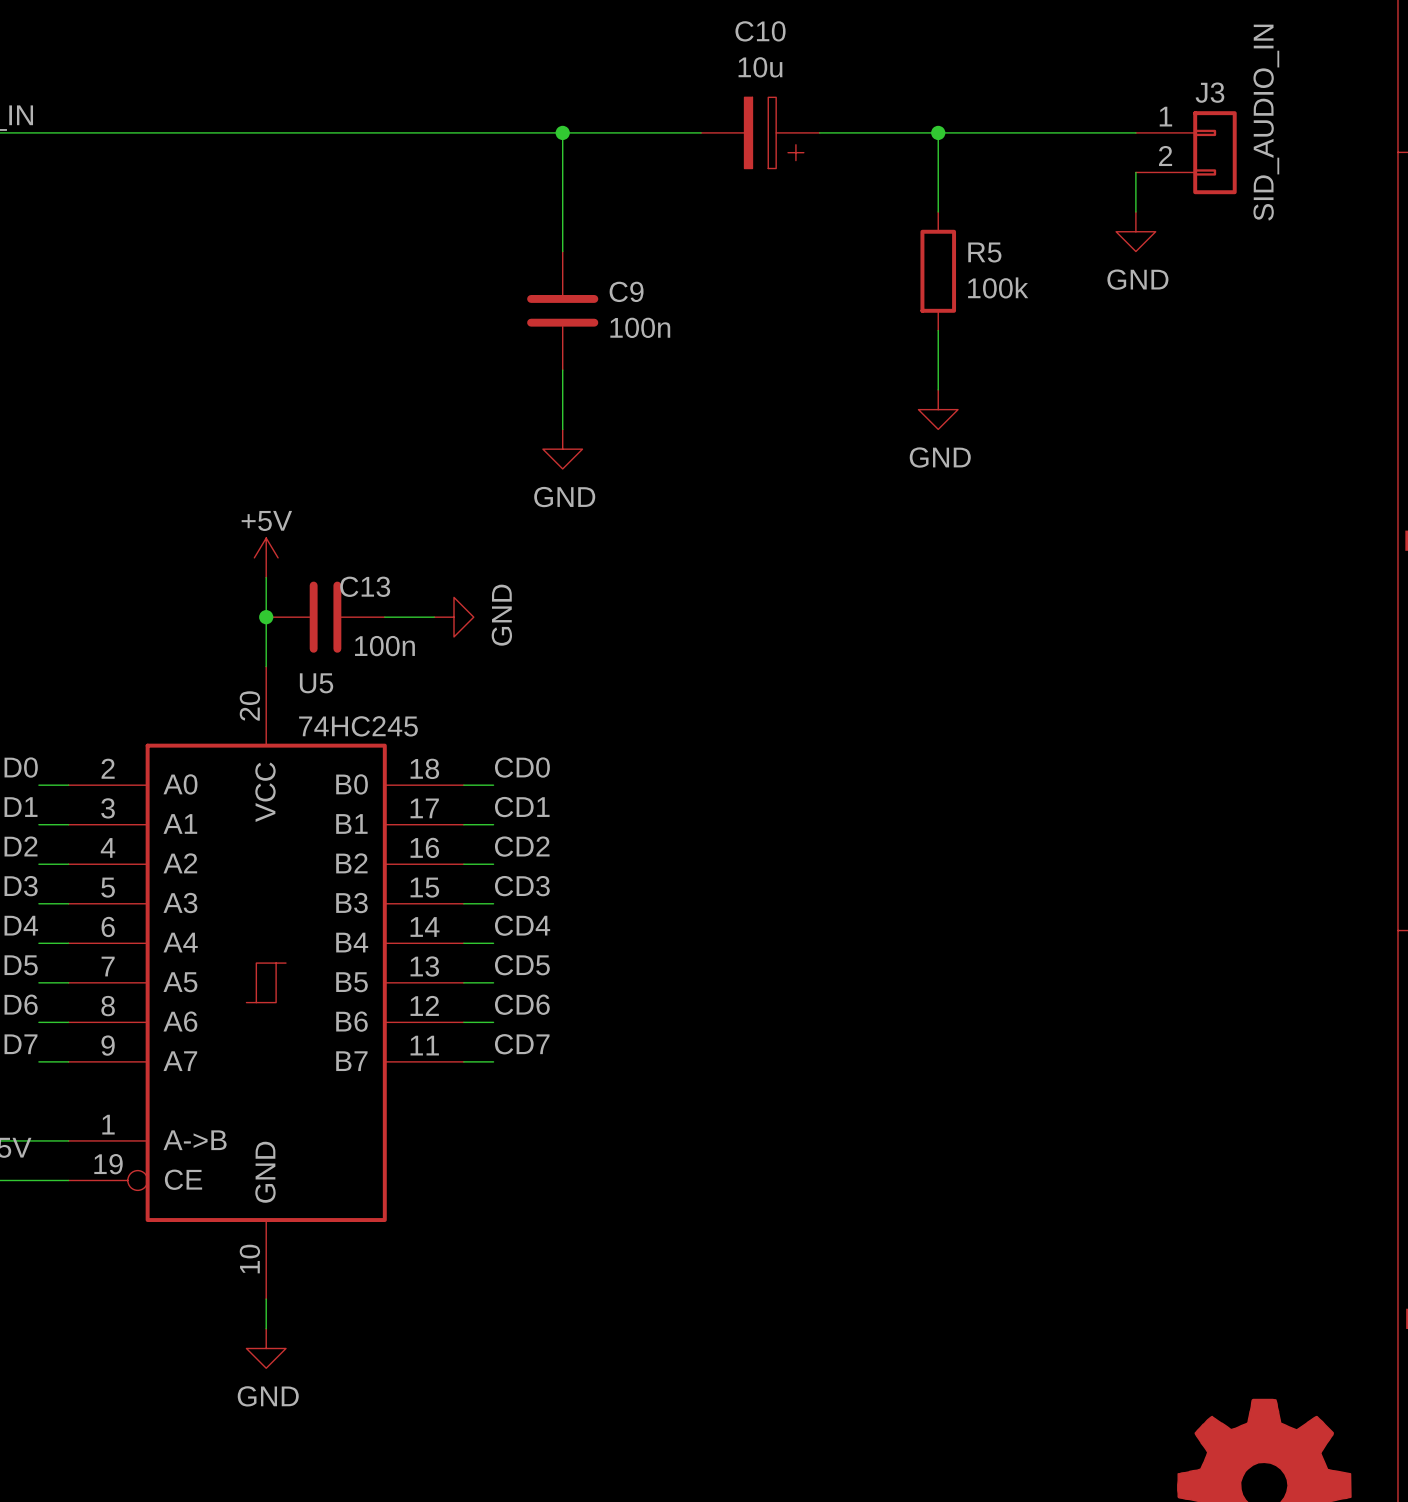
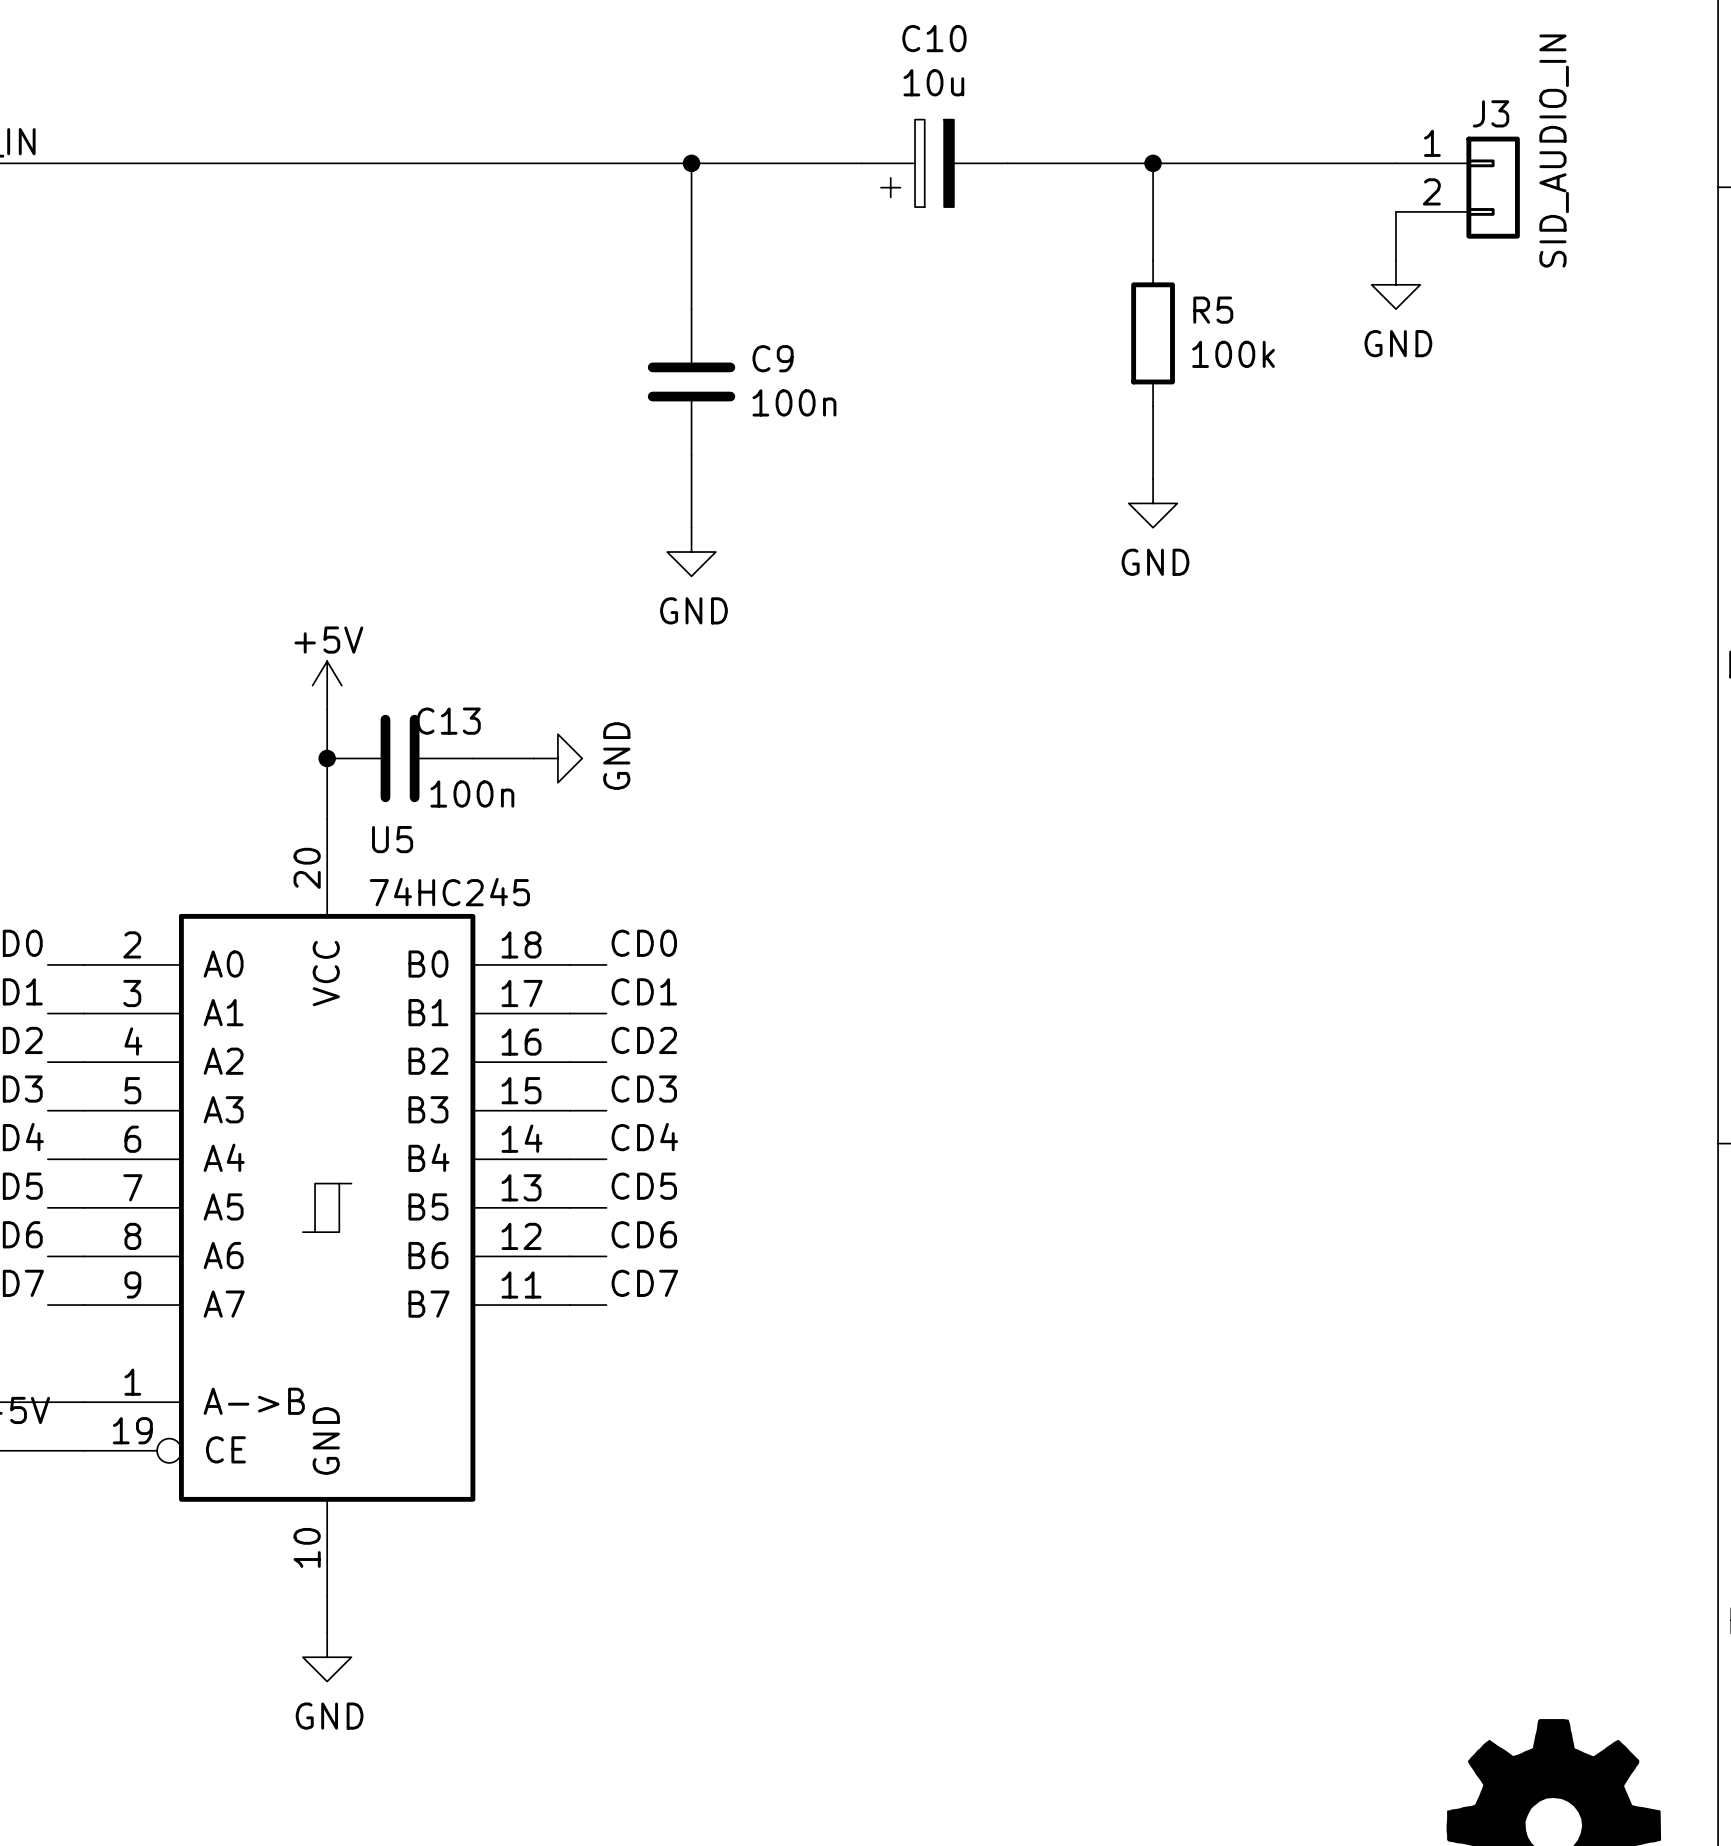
C10 flip: as is (774, 132) -> left-right (917, 163)

